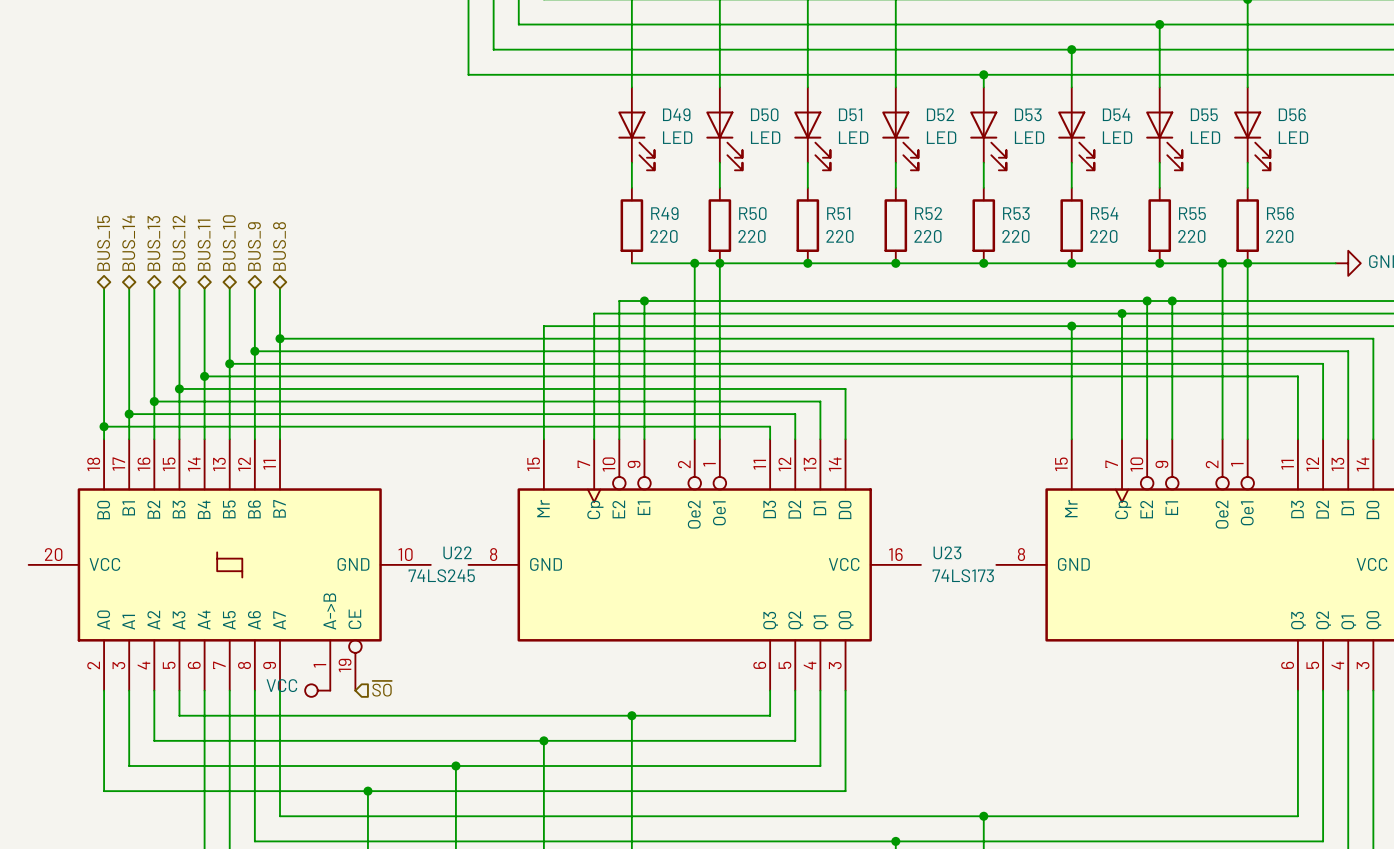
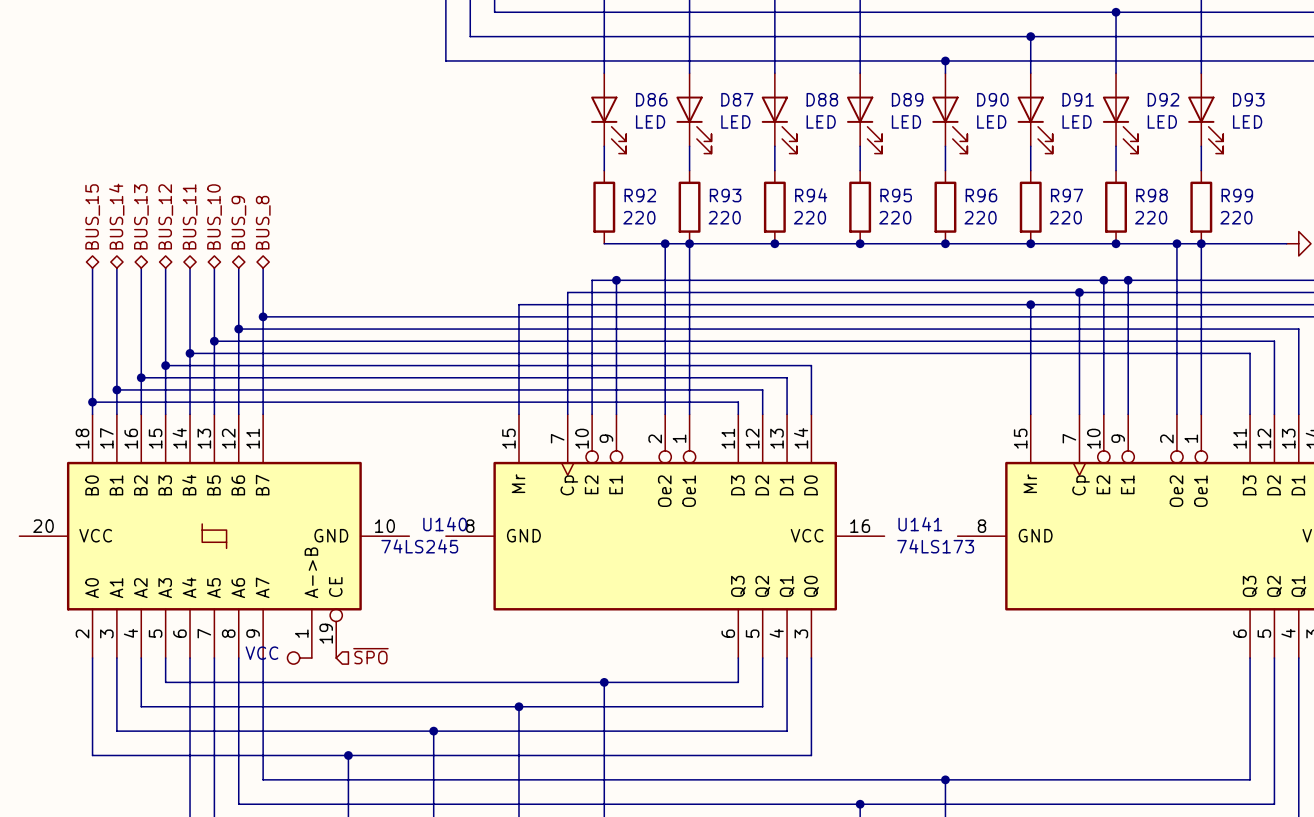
D49 name: D49 (676, 114) -> D86 (651, 99)
D50 name: D50 (764, 114) -> D87 (737, 99)
D51 name: D51 (850, 114) -> D88 (822, 99)
D52 name: D52 (940, 114) -> D89 (907, 99)
D53 name: D53 (1028, 114) -> D90 (992, 99)
D54 name: D54 (1116, 114) -> D91 (1078, 99)
D55 name: D55 (1204, 114) -> D92 (1163, 99)
D56 name: D56 (1292, 114) -> D93 (1248, 99)
R49 name: R49 (664, 213) -> R92 (640, 195)
R50 name: R50 (752, 213) -> R93 (725, 195)
R51 name: R51 (838, 213) -> R94 (811, 195)
R52 name: R52 (928, 213) -> R95 (896, 195)
R53 name: R53 (1016, 213) -> R96 (981, 195)
R54 name: R54 (1104, 213) -> R97 (1067, 195)
R55 name: R55 (1192, 213) -> R98 (1152, 195)
R56 name: R56 (1280, 213) -> R99 (1237, 195)
U22 name: U22 (457, 552) -> U140 (445, 524)
U23 name: U23 (947, 552) -> U141 (920, 524)
hierarchical label: ~{SO} (382, 688) -> ~{SPO} (370, 656)

